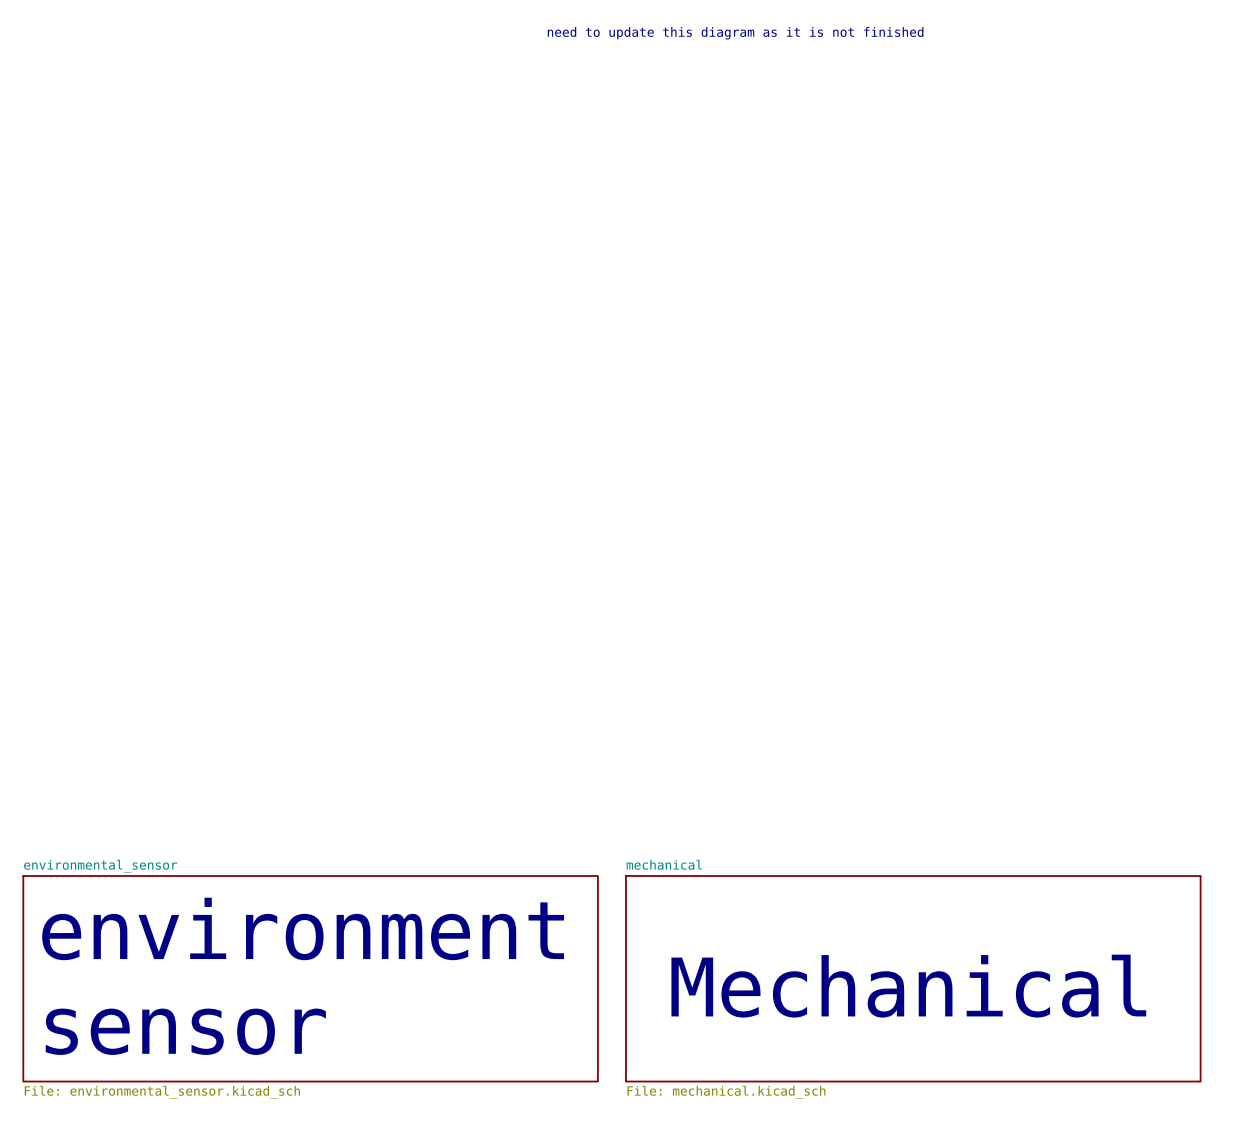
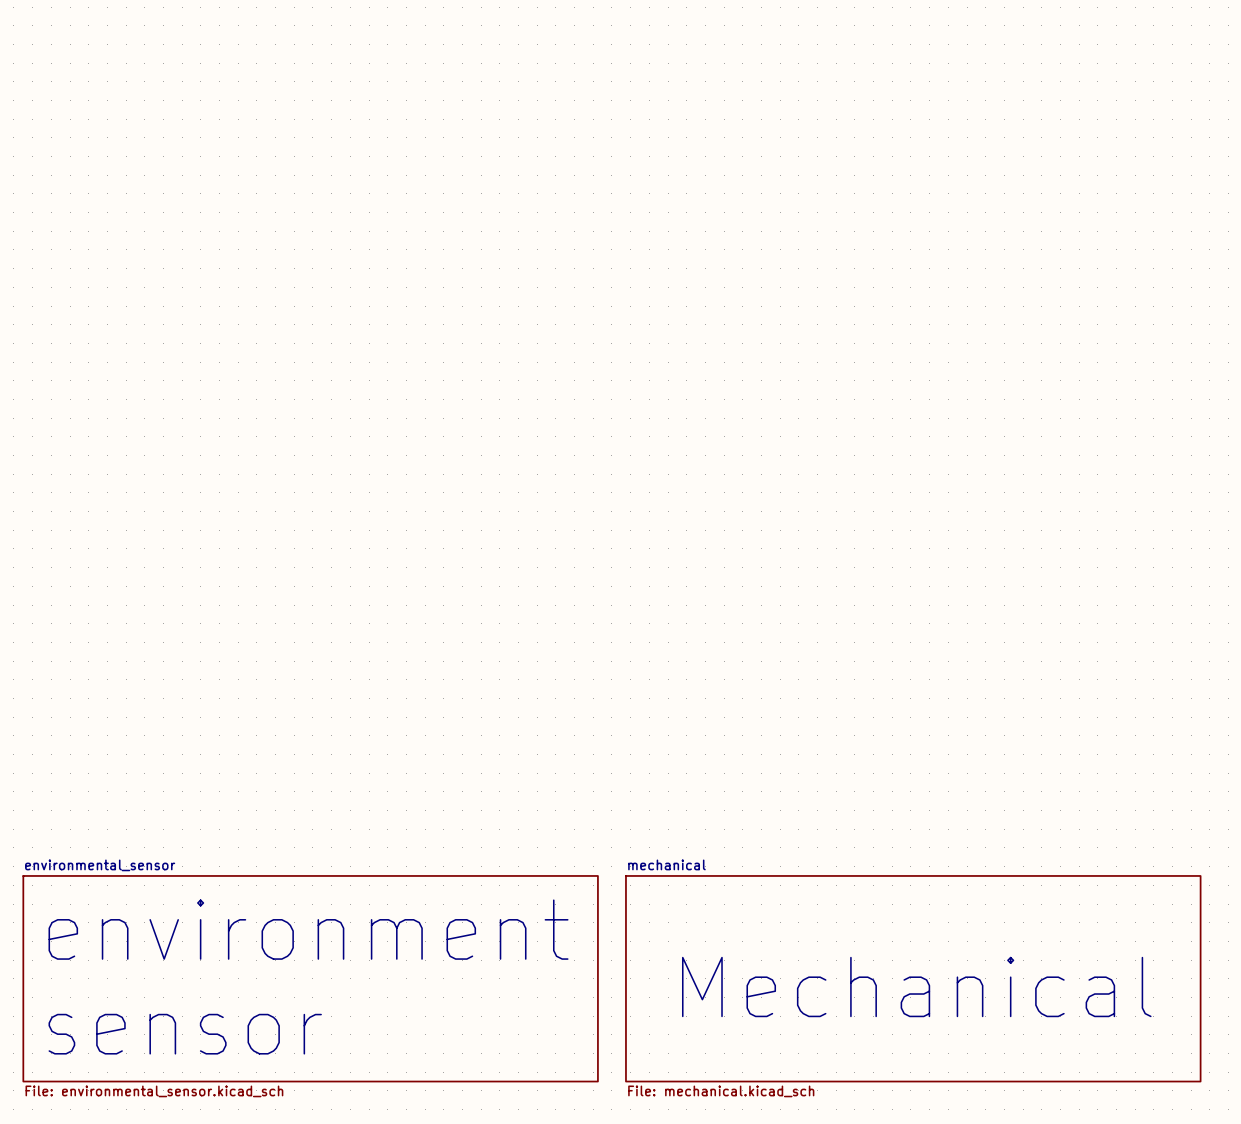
text: need to update this diagram as it is not finished (735, 33) -> none

